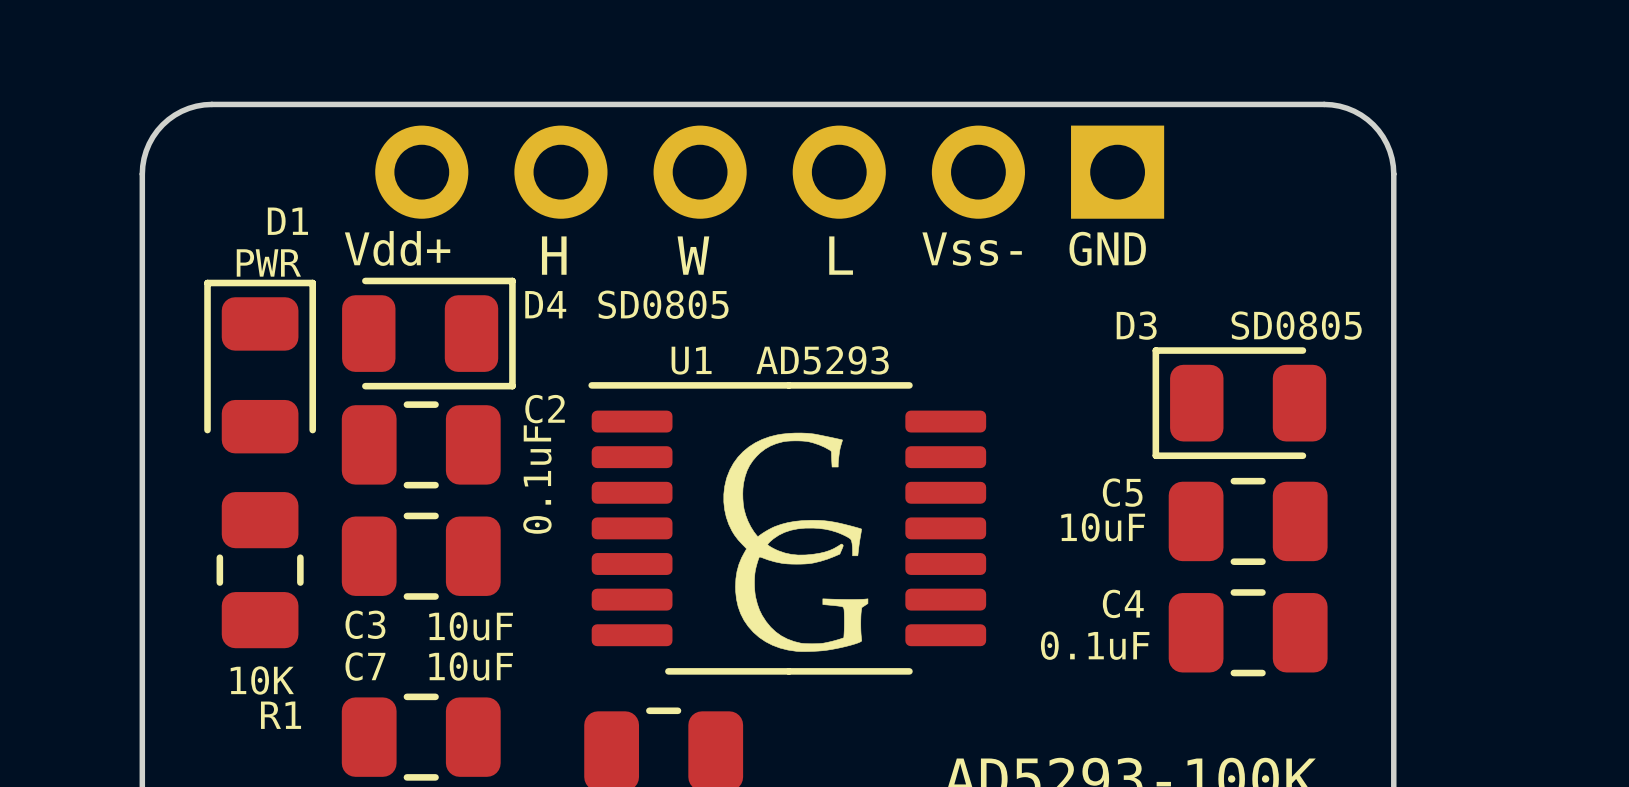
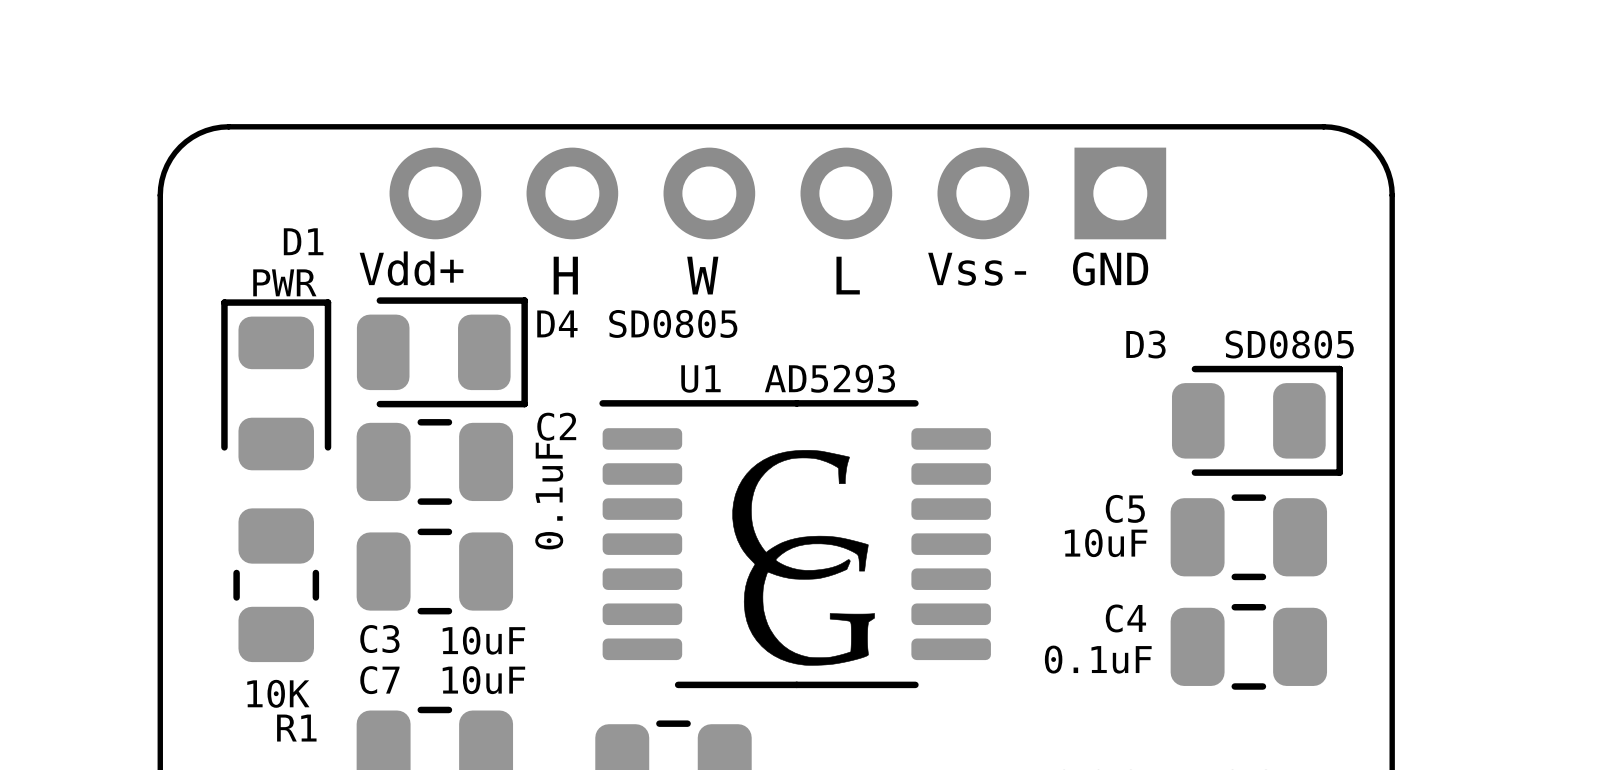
D3 rotation: 0° (1239, 403) -> 180° (1257, 420)

